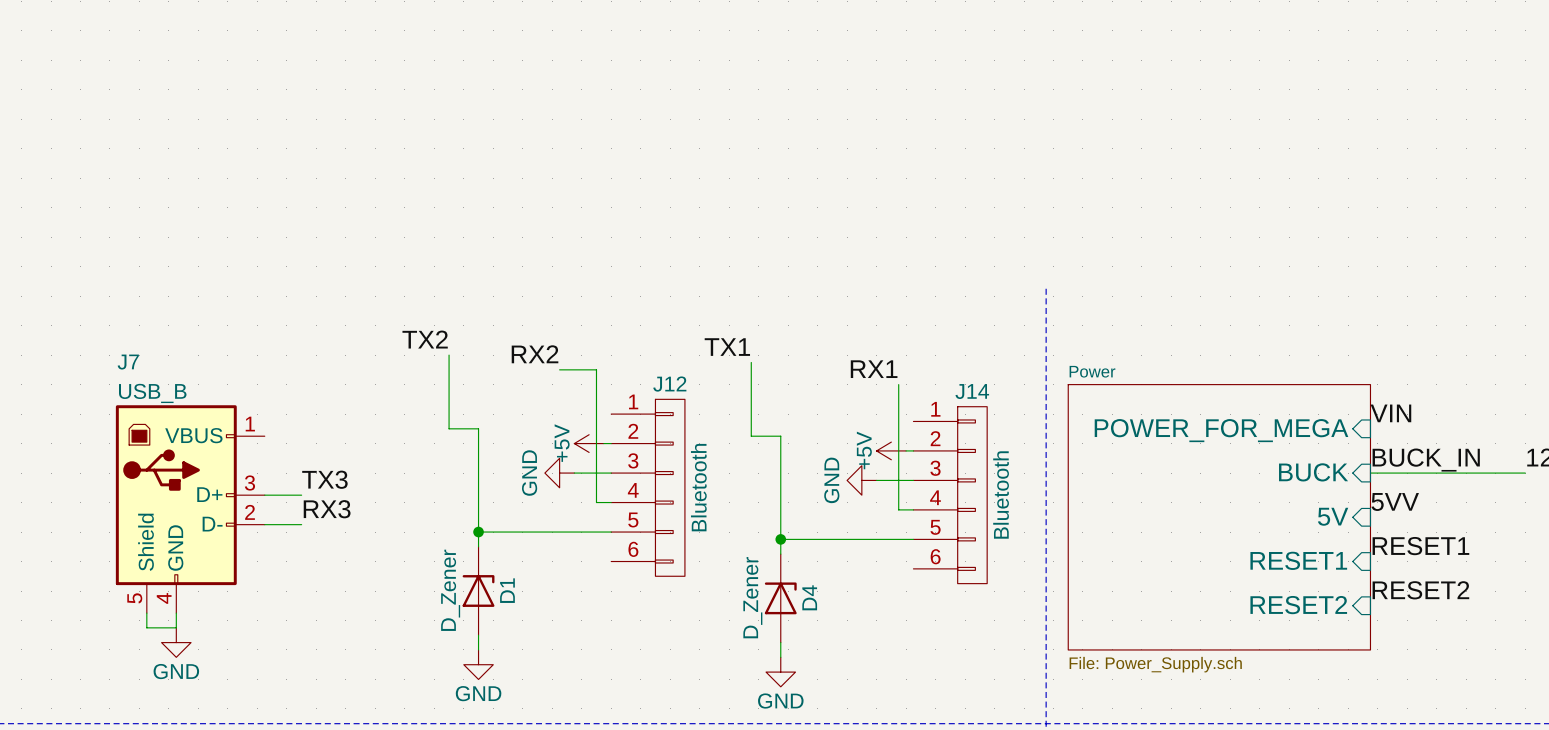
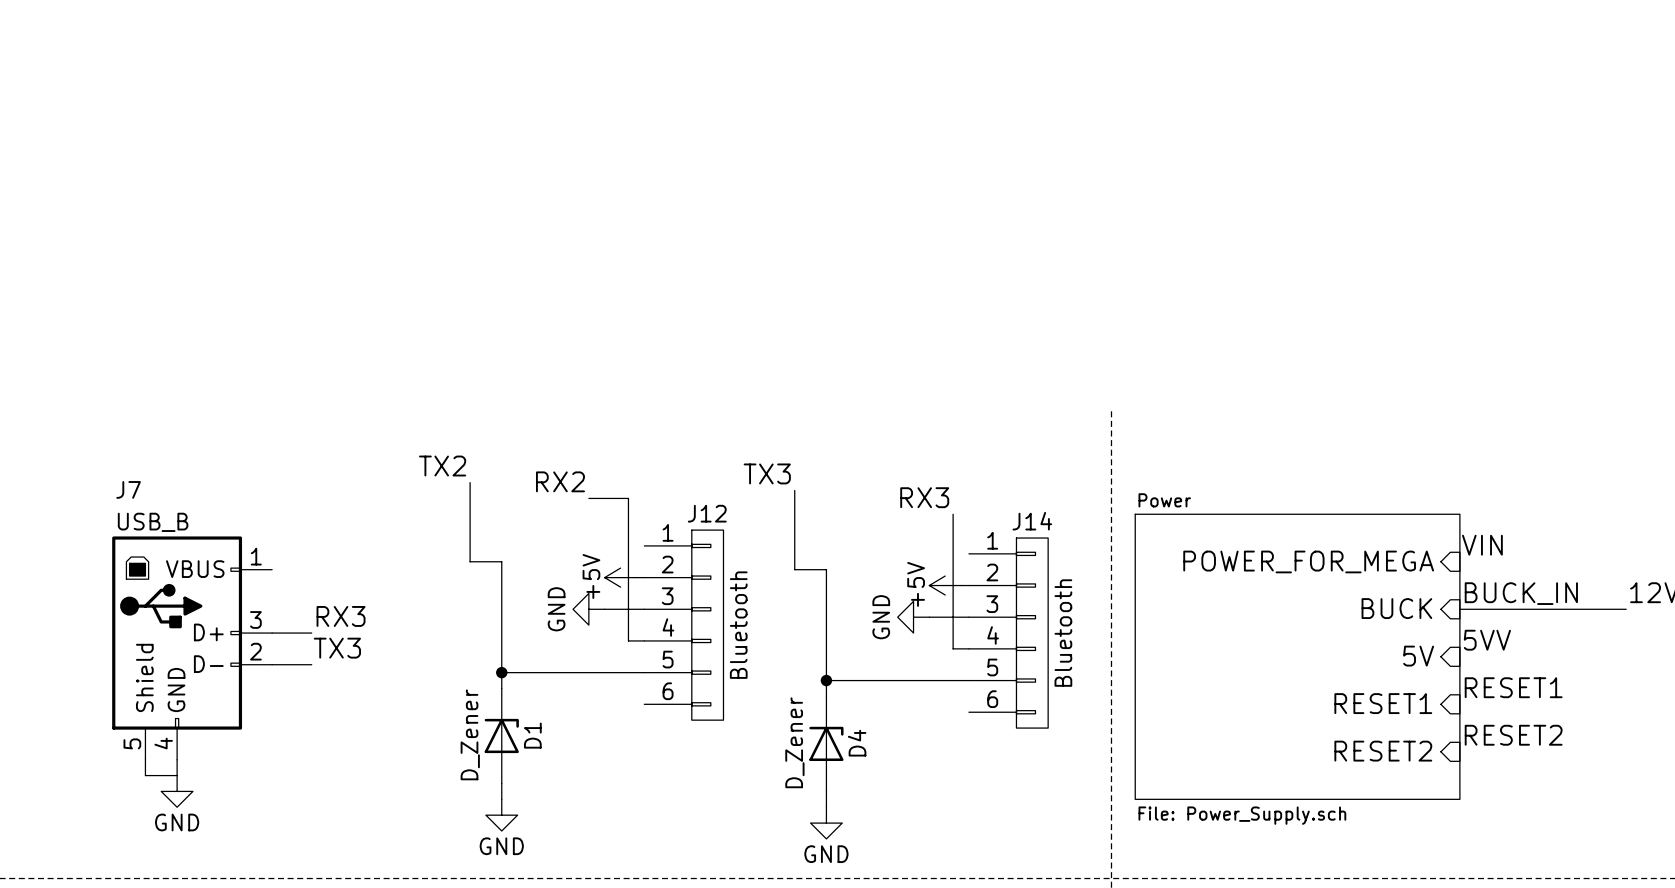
label: TX1 (727, 347) -> TX3 (767, 473)
label: RX1 (874, 369) -> RX3 (924, 497)
label: TX3 (324, 479) -> RX3 (341, 616)
label: RX3 (327, 509) -> TX3 (337, 648)

